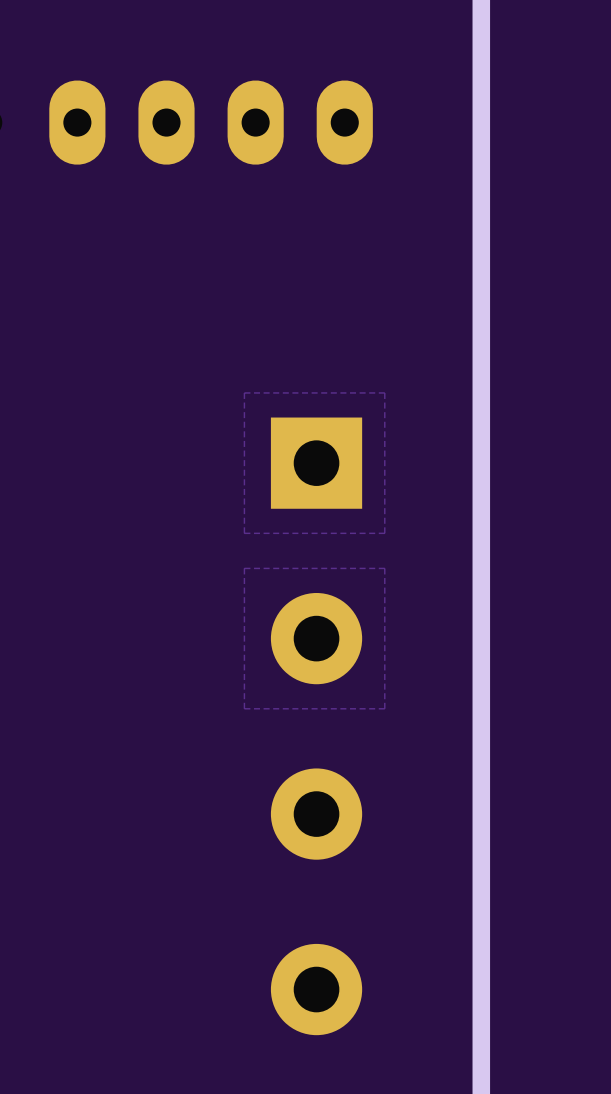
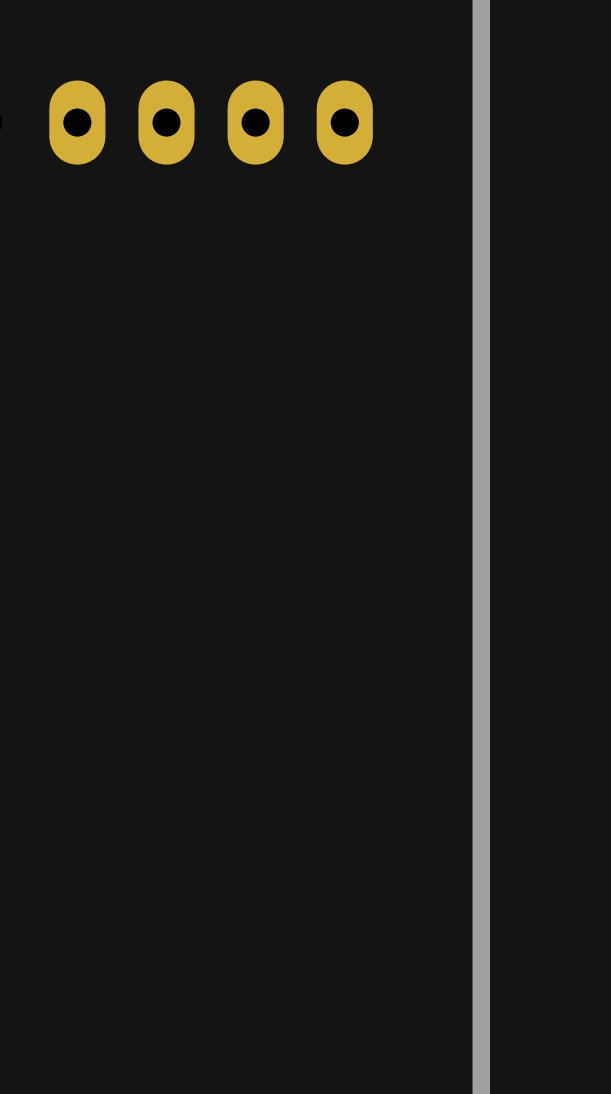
zone outline: (384, 392) (384, 533) (244, 533) (244, 392) (384, 392) -> none
zone outline: (384, 568) (384, 708) (244, 708) (244, 568) (384, 568) -> none
part: (316, 726) -> none

